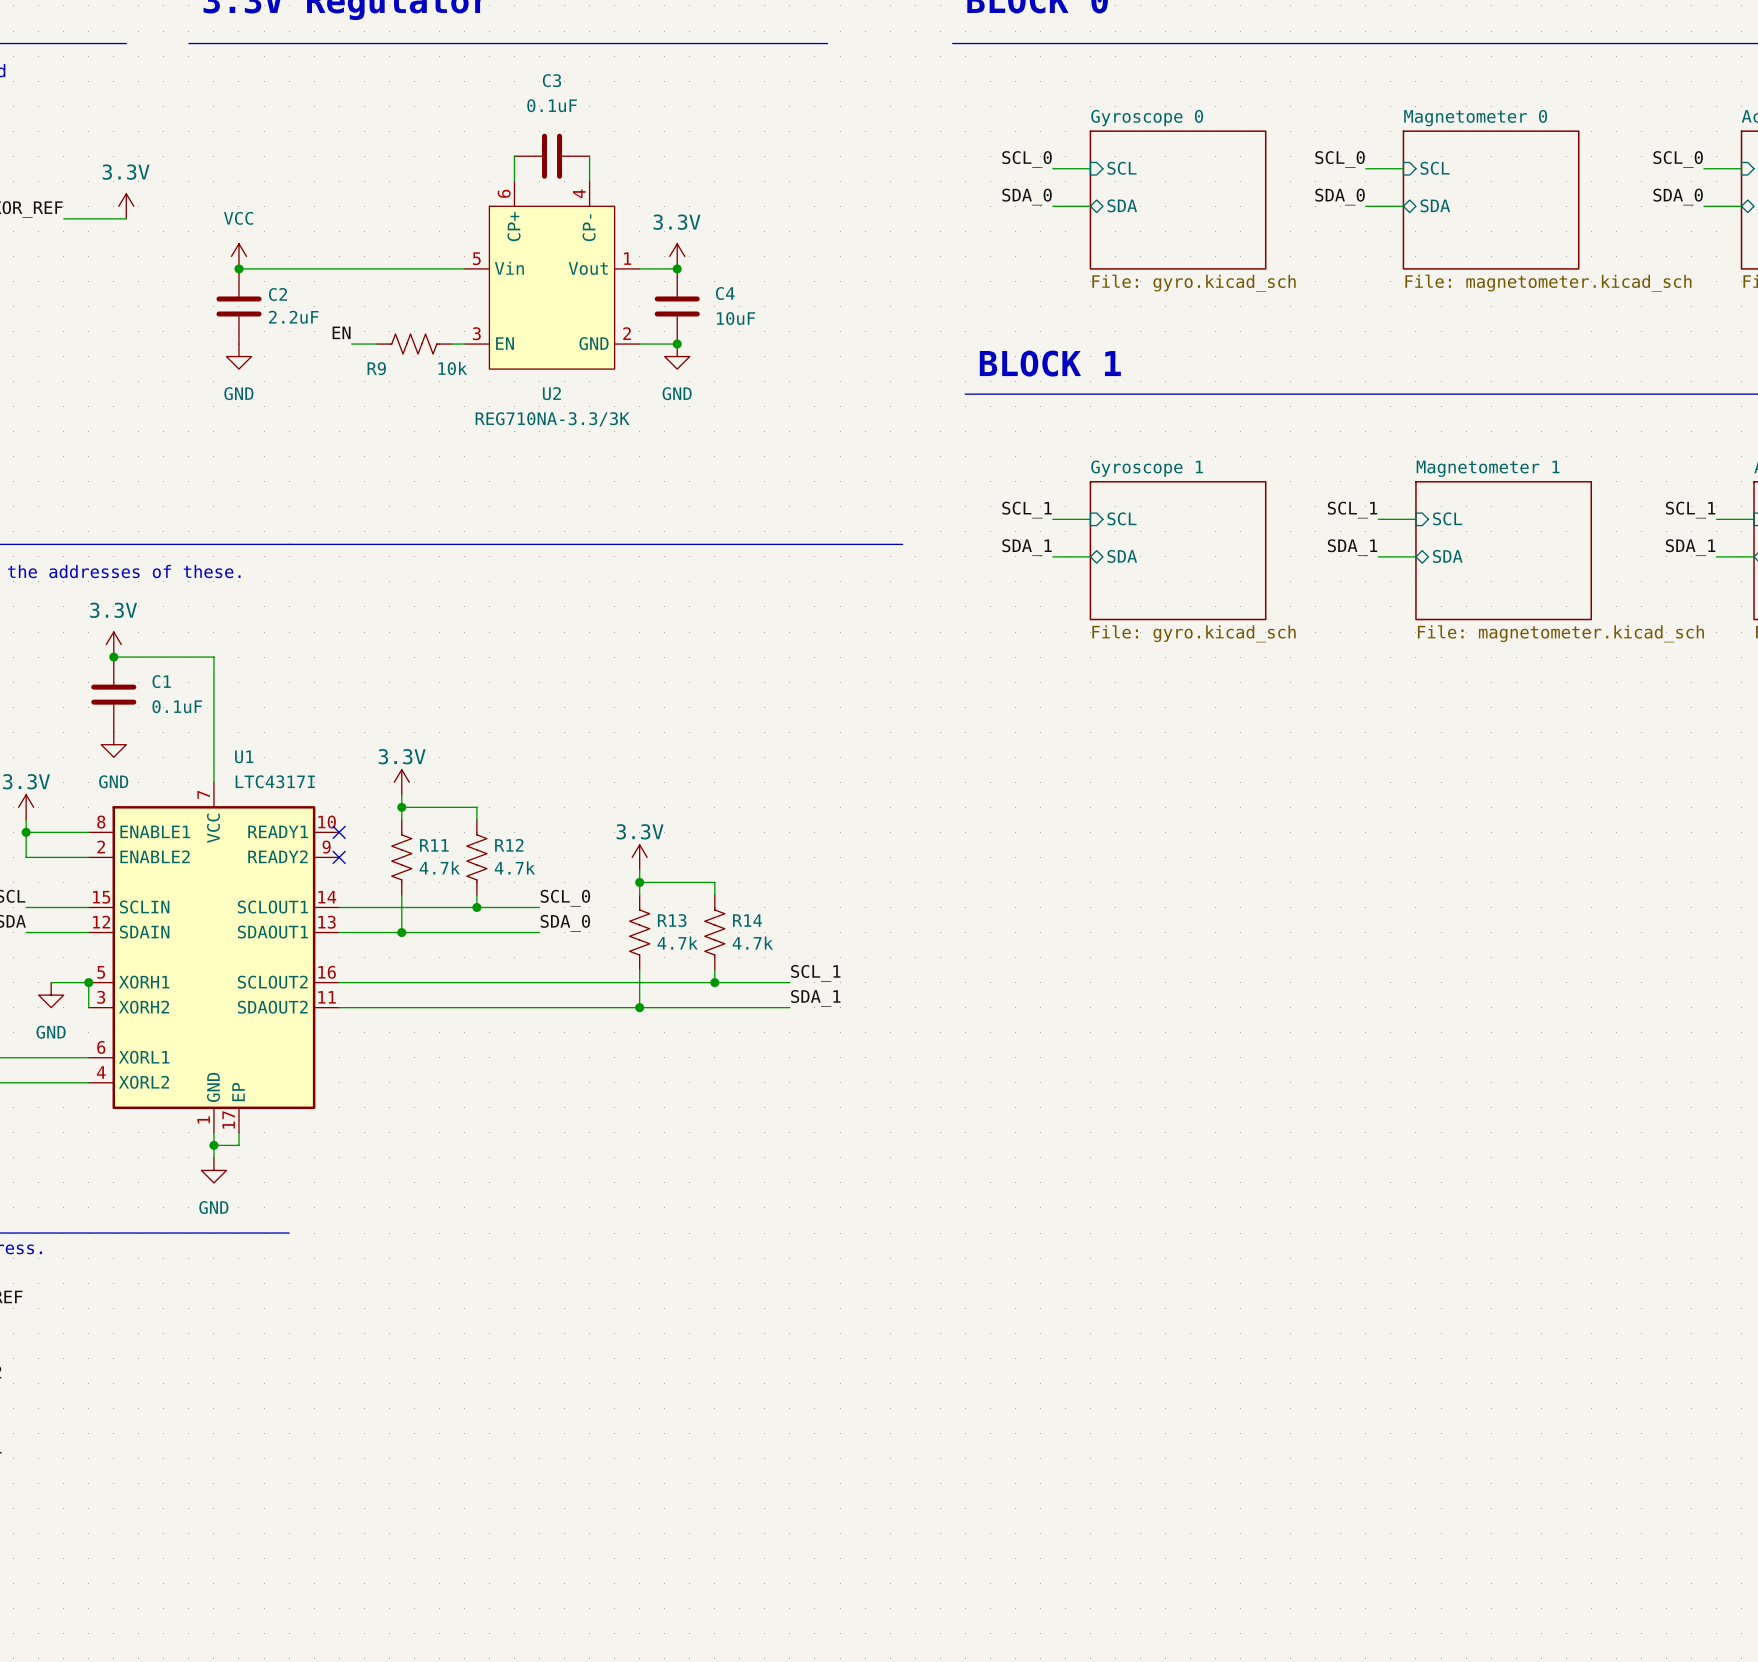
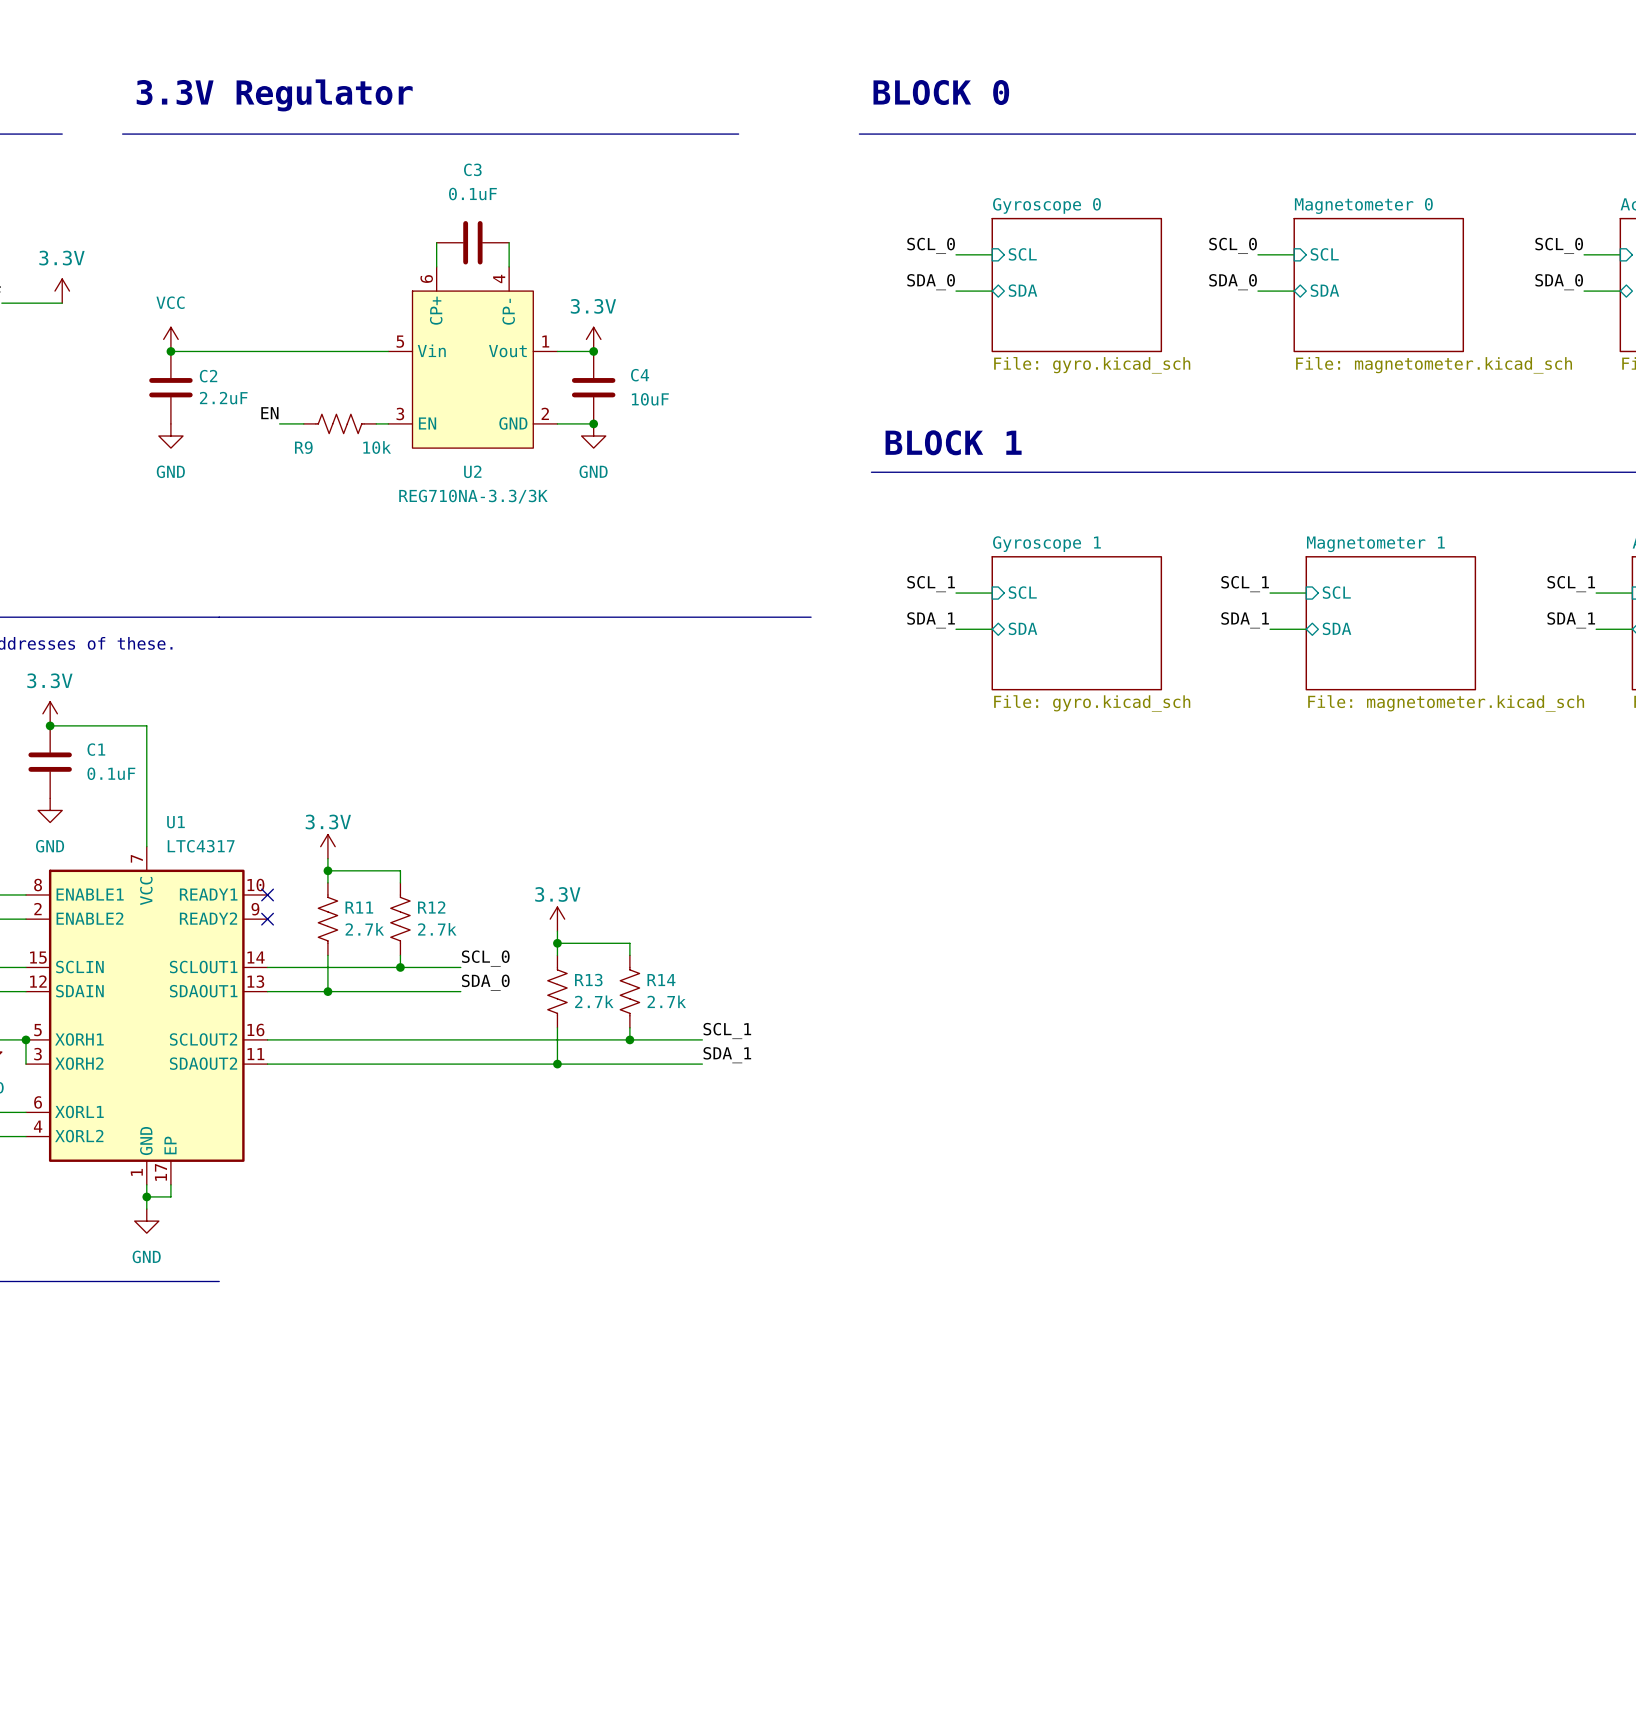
U1 value: LTC4317I (275, 781) -> LTC4317 (201, 846)
R11 value: 4.7k (439, 867) -> 2.7k (364, 929)
R12 value: 4.7k (514, 867) -> 2.7k (437, 929)
R13 value: 4.7k (677, 943) -> 2.7k (594, 1001)
R14 value: 4.7k (752, 943) -> 2.7k (666, 1001)

